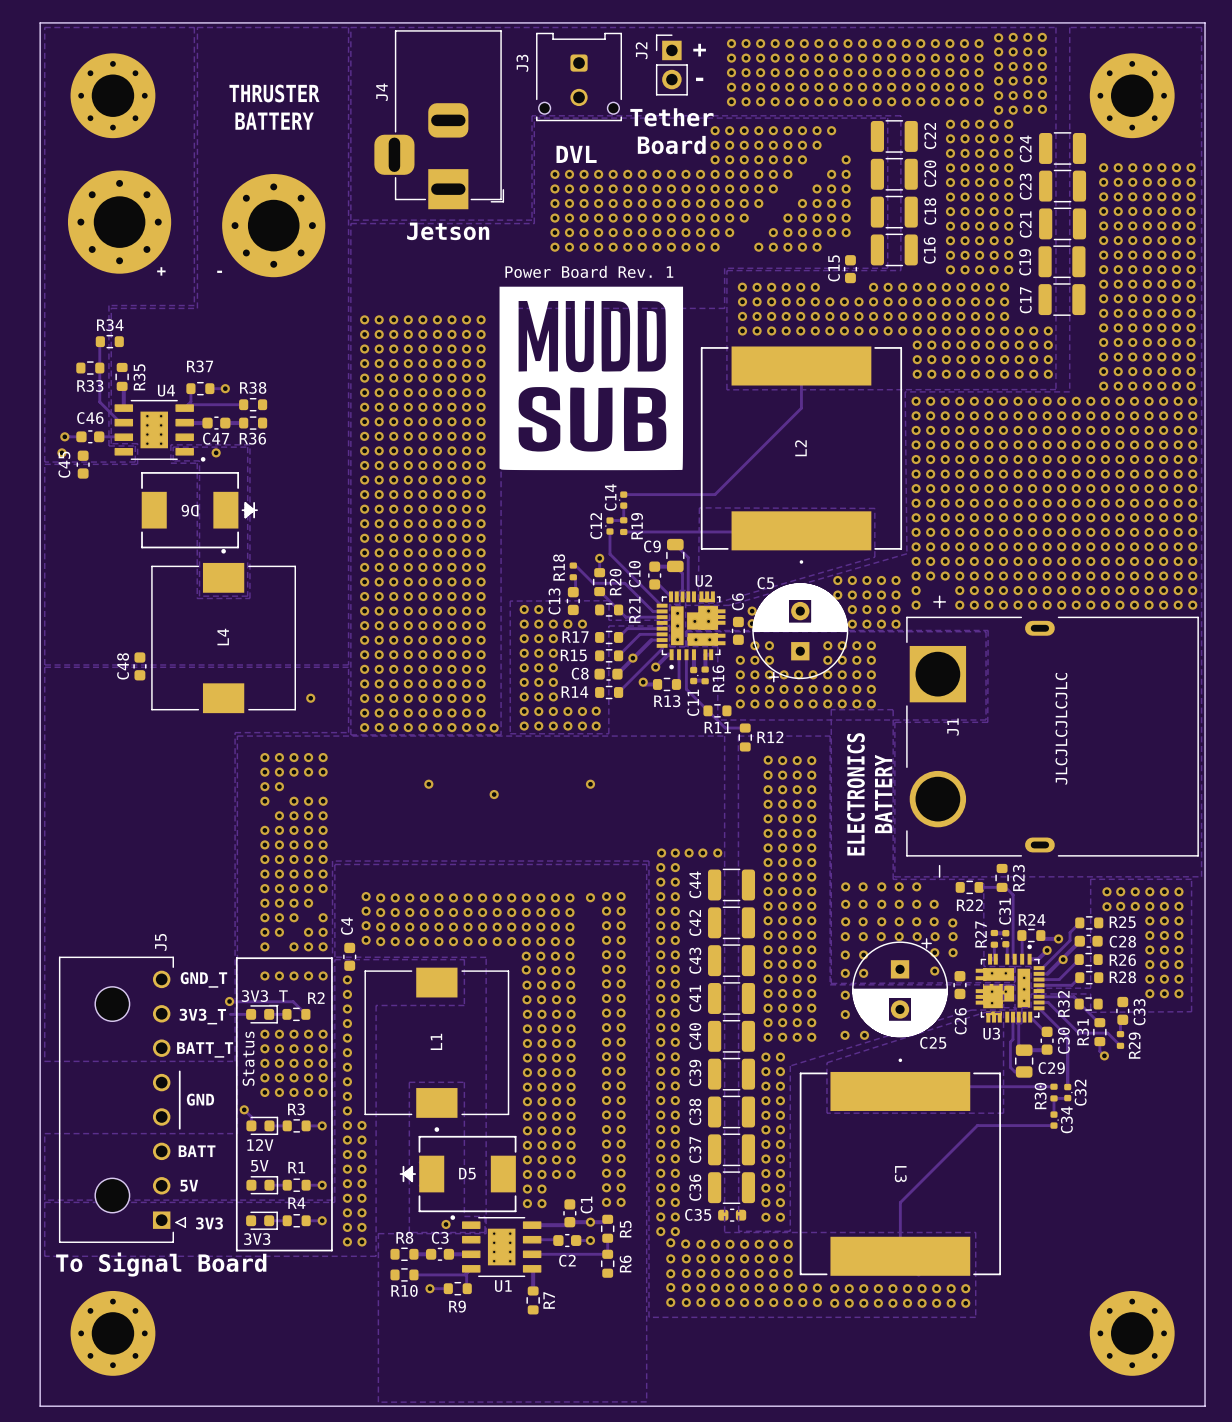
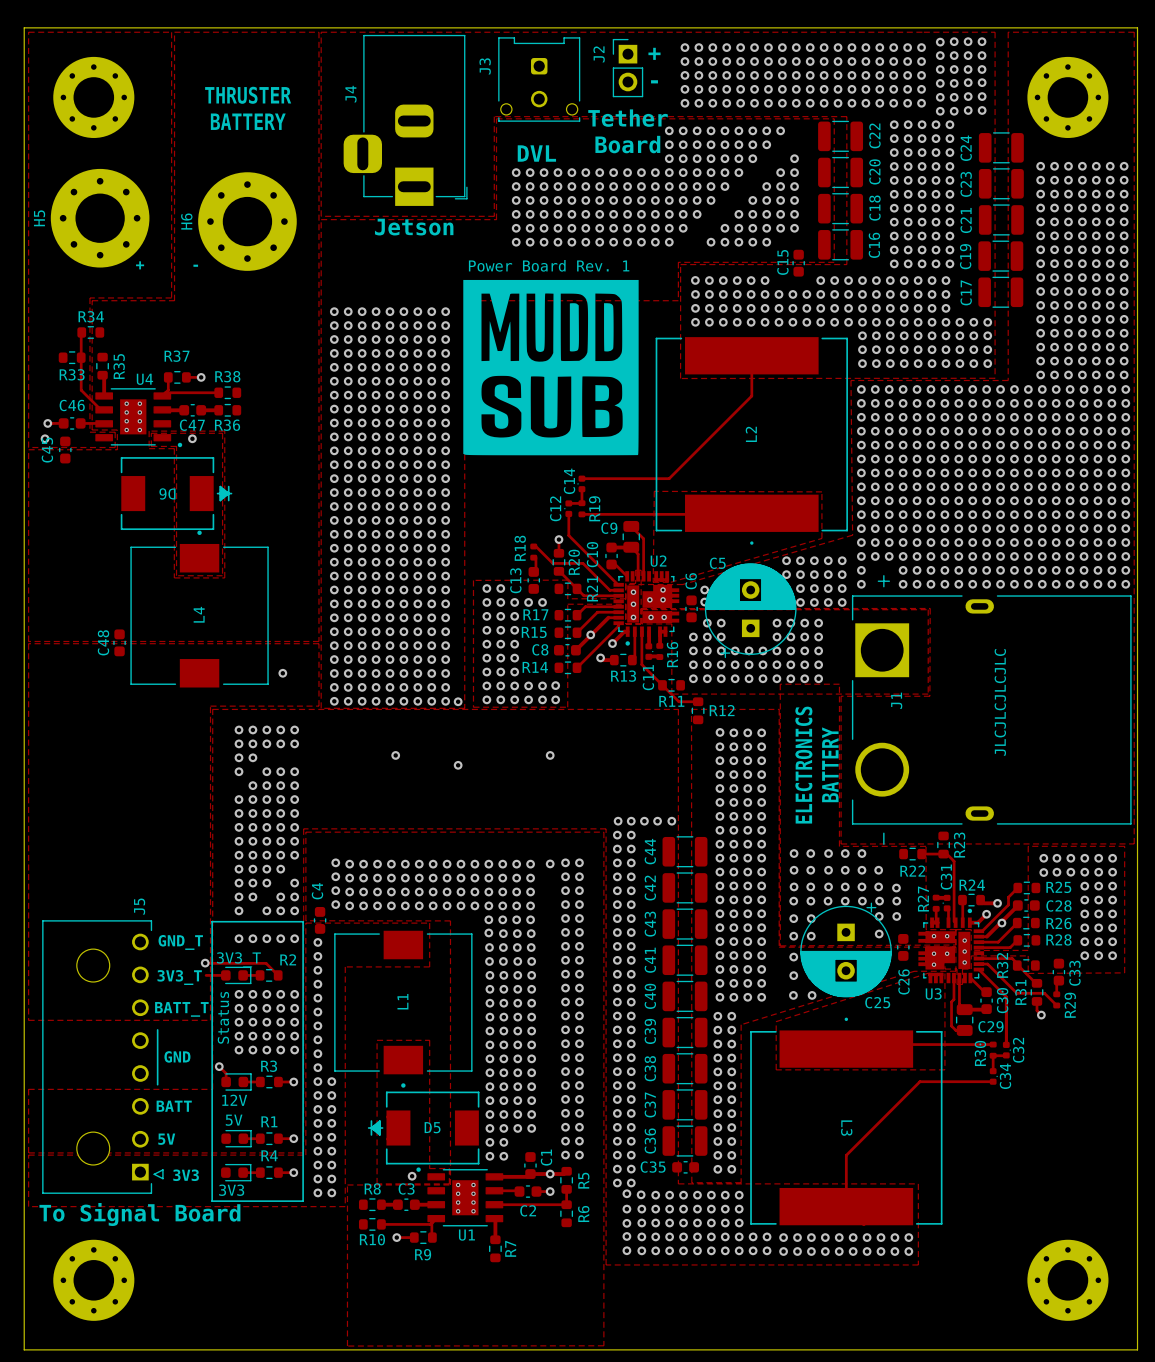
H5 name: none -> H5 (39, 218)
H6 name: none -> H6 (186, 221)

